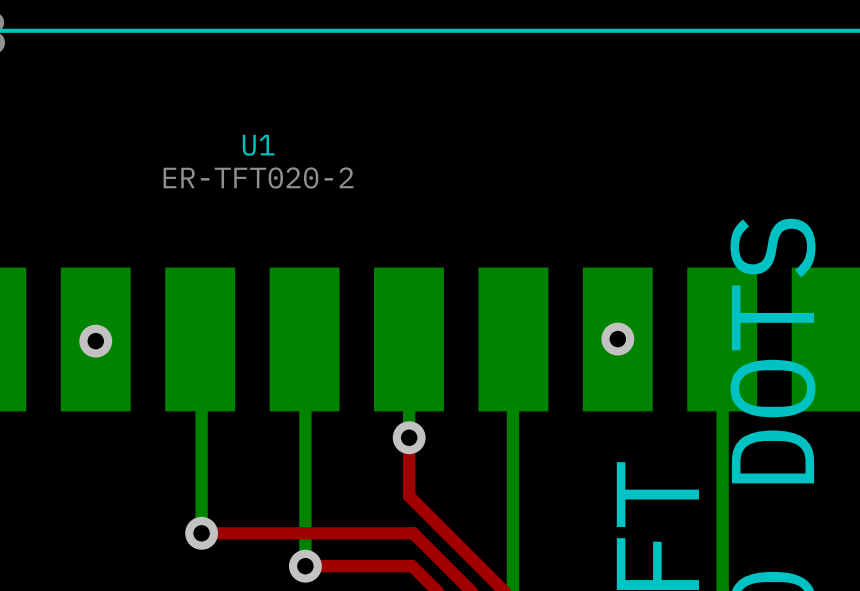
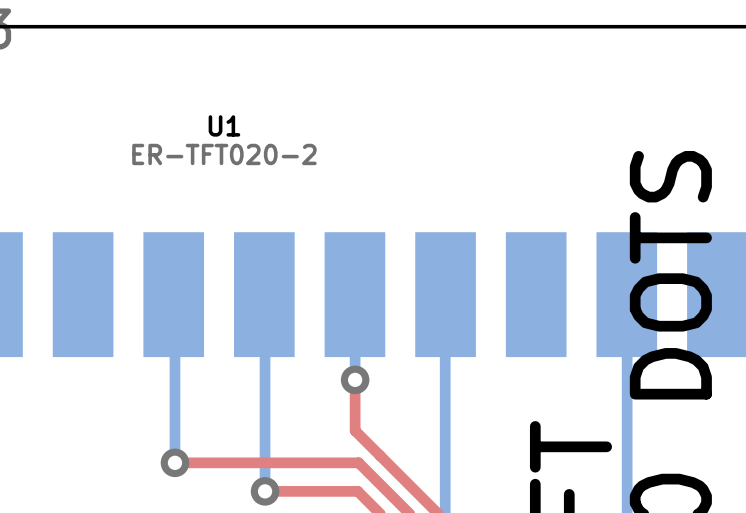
via: (617, 339) -> none
via: (95, 341) -> none

